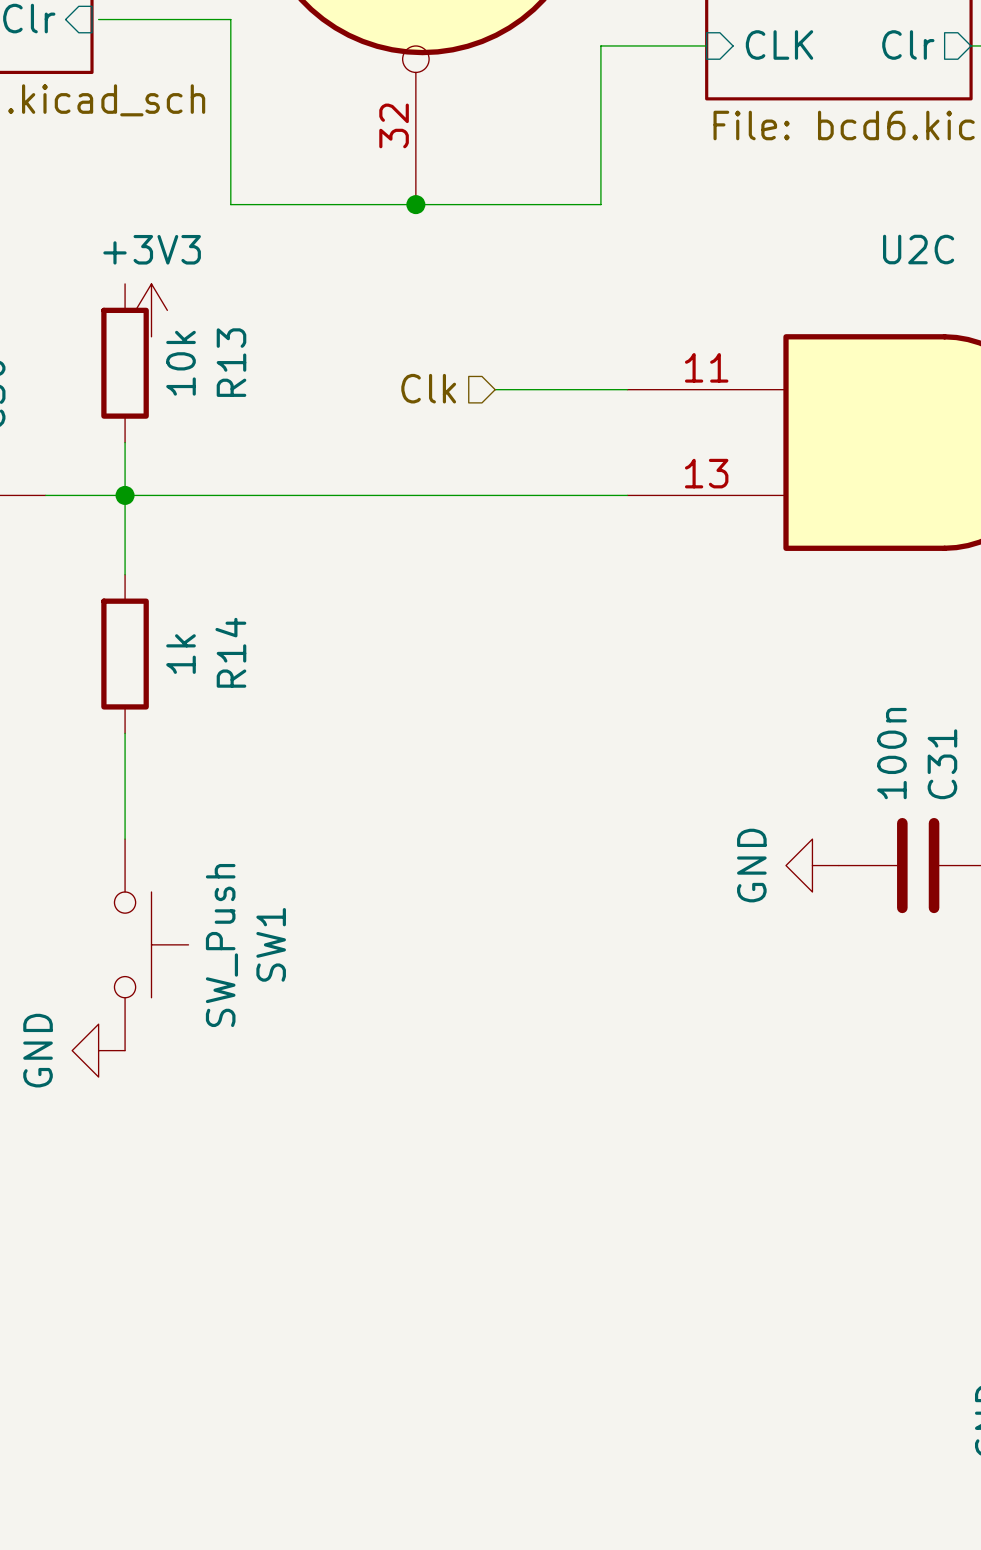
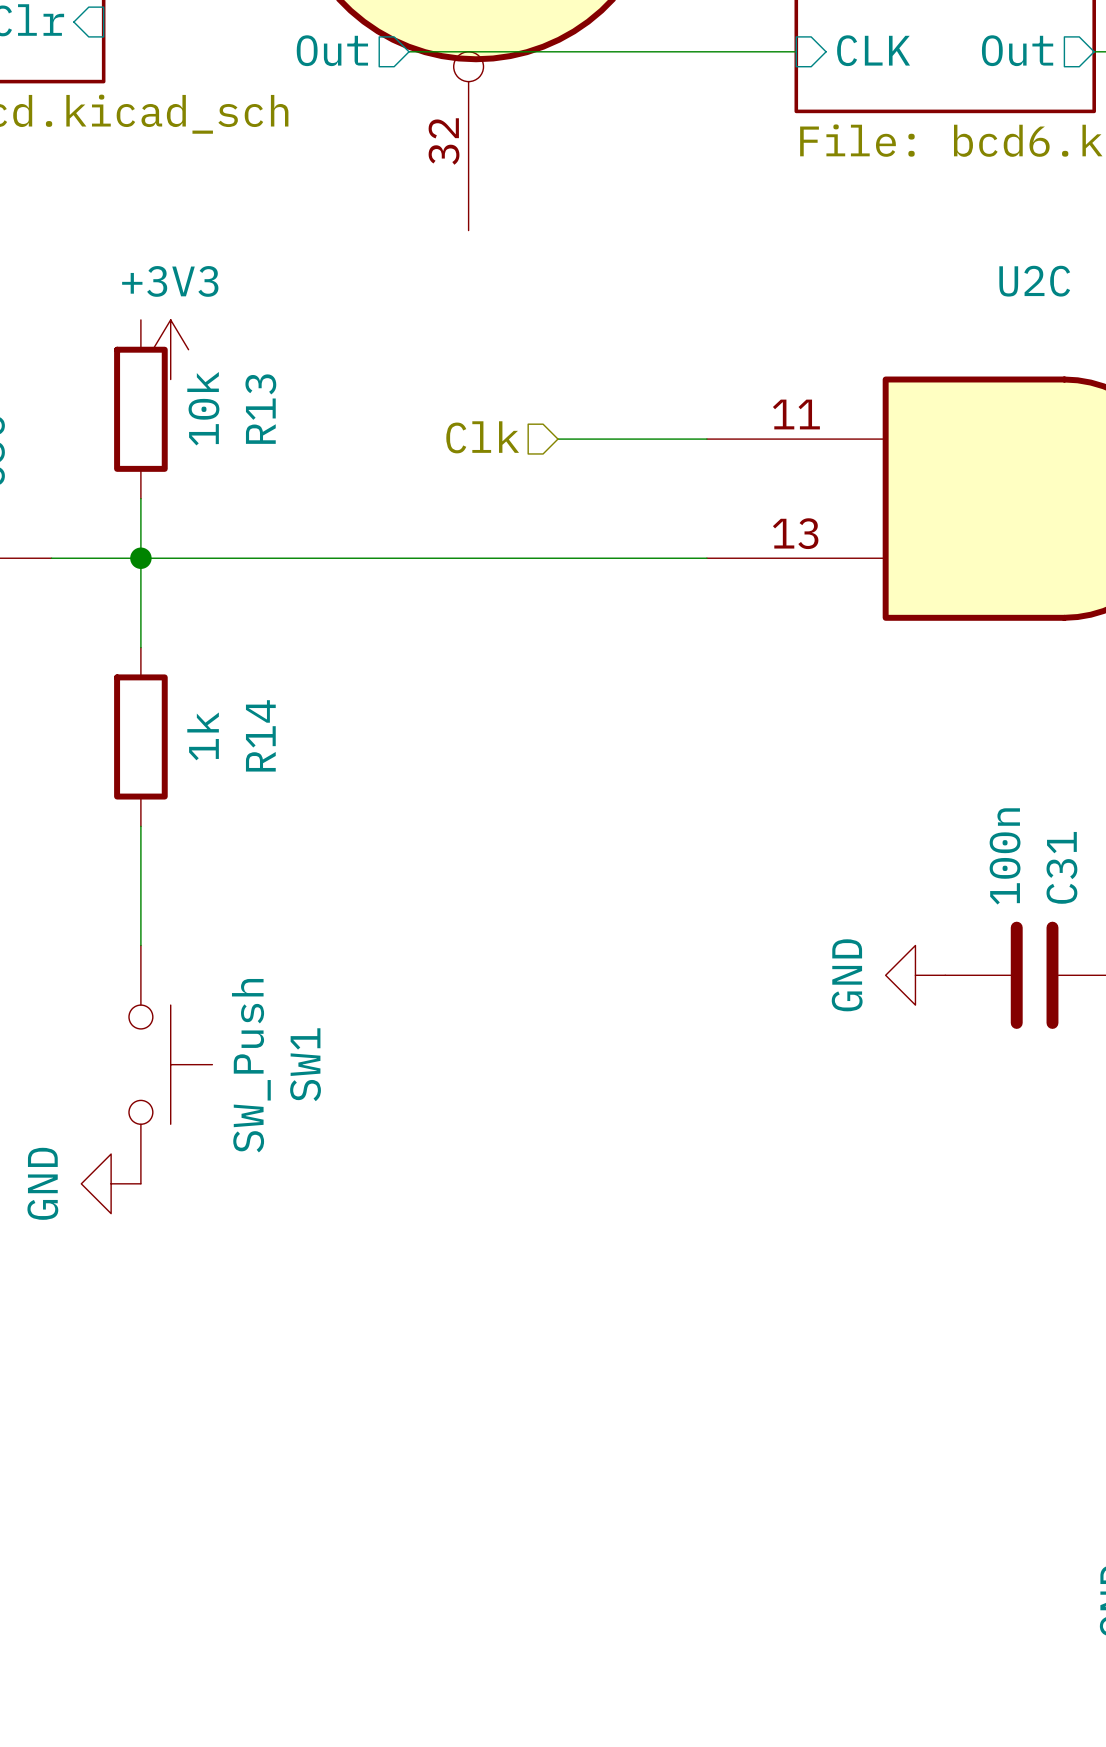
wire: (98, 19) (230, 19) (230, 204) (600, 204) (600, 45) -> (409, 51) (677, 51)
sheet pin: none -> Out (332, 50)
sheet pin: Clr (908, 44) -> Out (1017, 50)
junction: (415, 204) -> none

